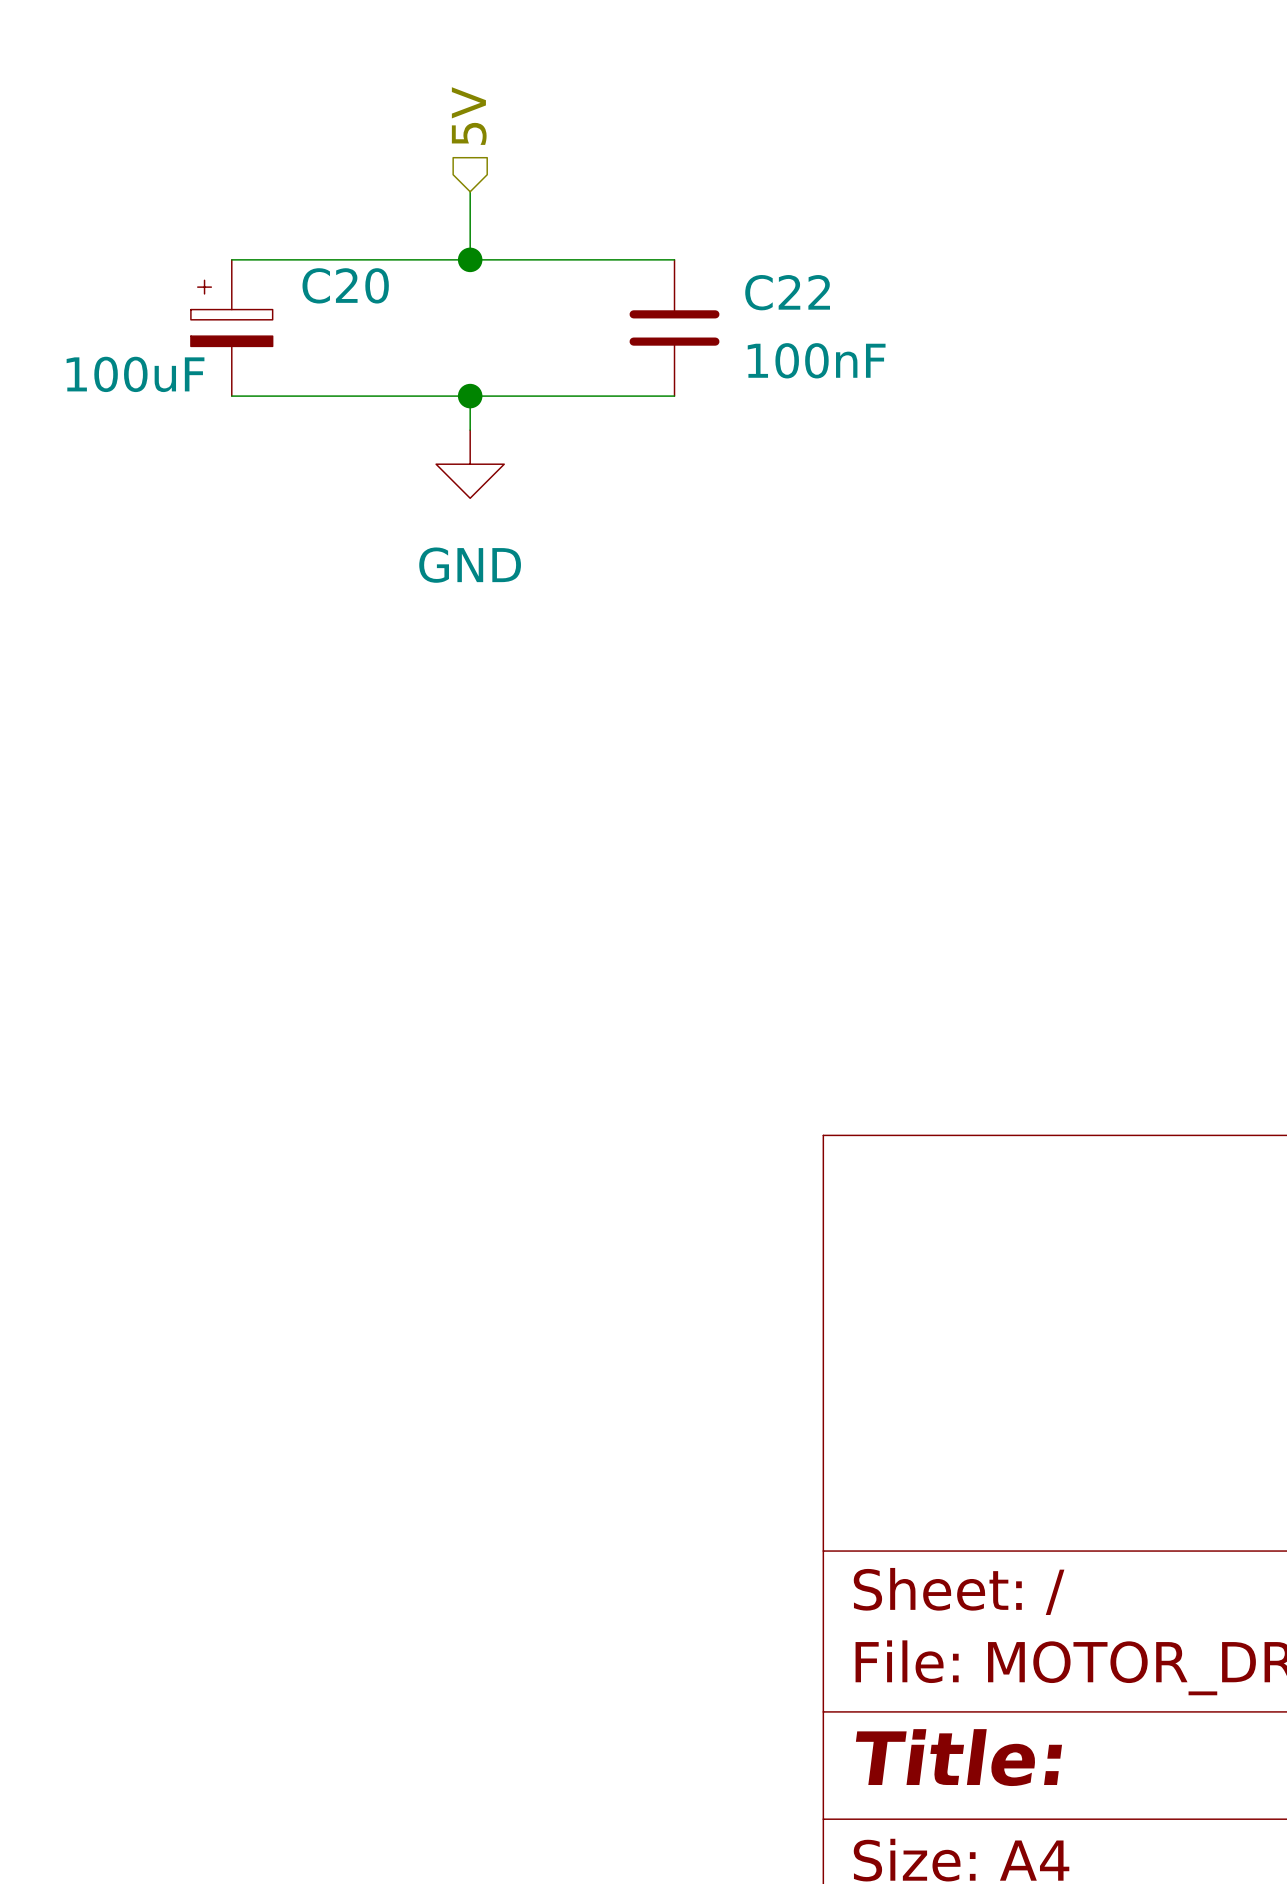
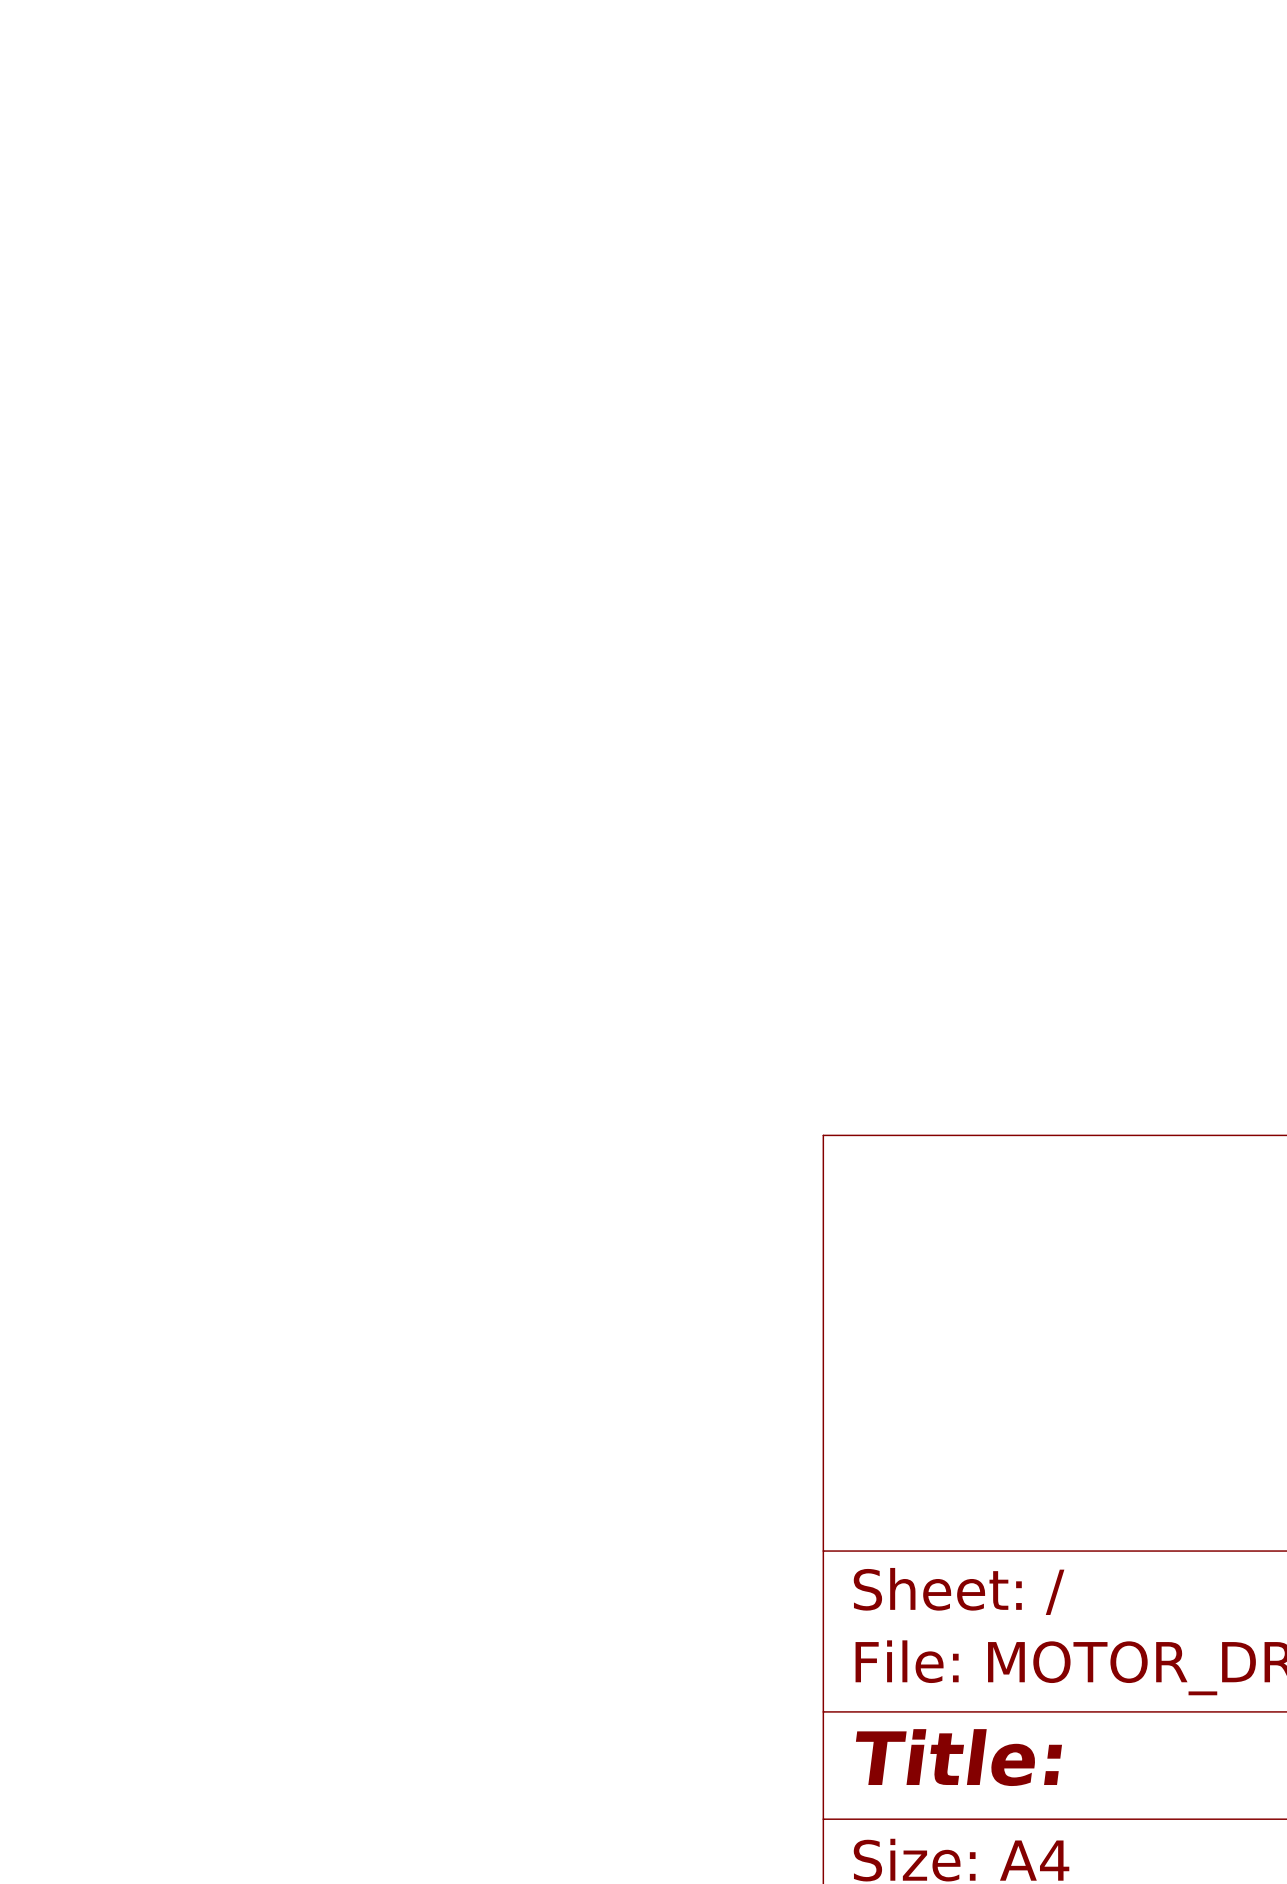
hierarchical label: 5V (469, 116) -> none
wire: (470, 191) (470, 259) -> none
wire: (231, 259) (674, 259) -> none
junction: (470, 259) -> none
C20: 100uF (231, 327) -> none
C22: 100nF (674, 327) -> none
wire: (231, 396) (674, 396) -> none
wire: (470, 396) (470, 430) -> none
junction: (470, 396) -> none
power symbol: GND (470, 464) -> none

